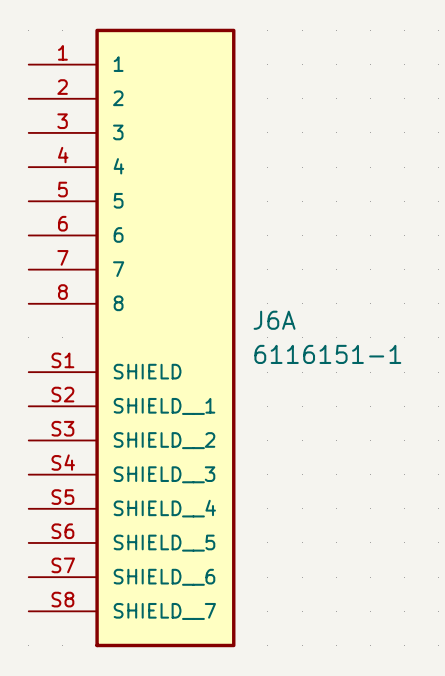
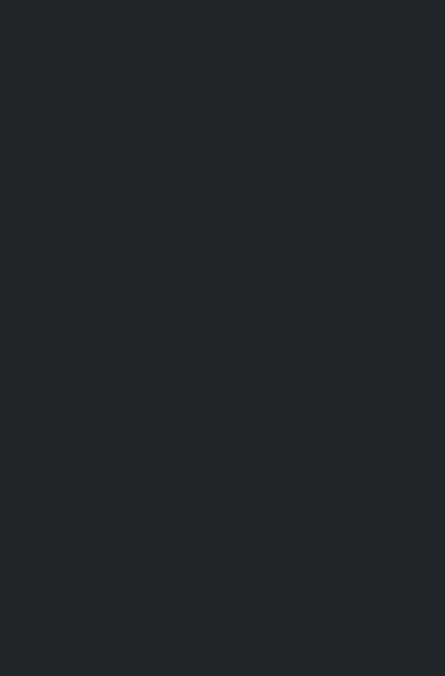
J6A: 6116151-1 (132, 337) -> none

